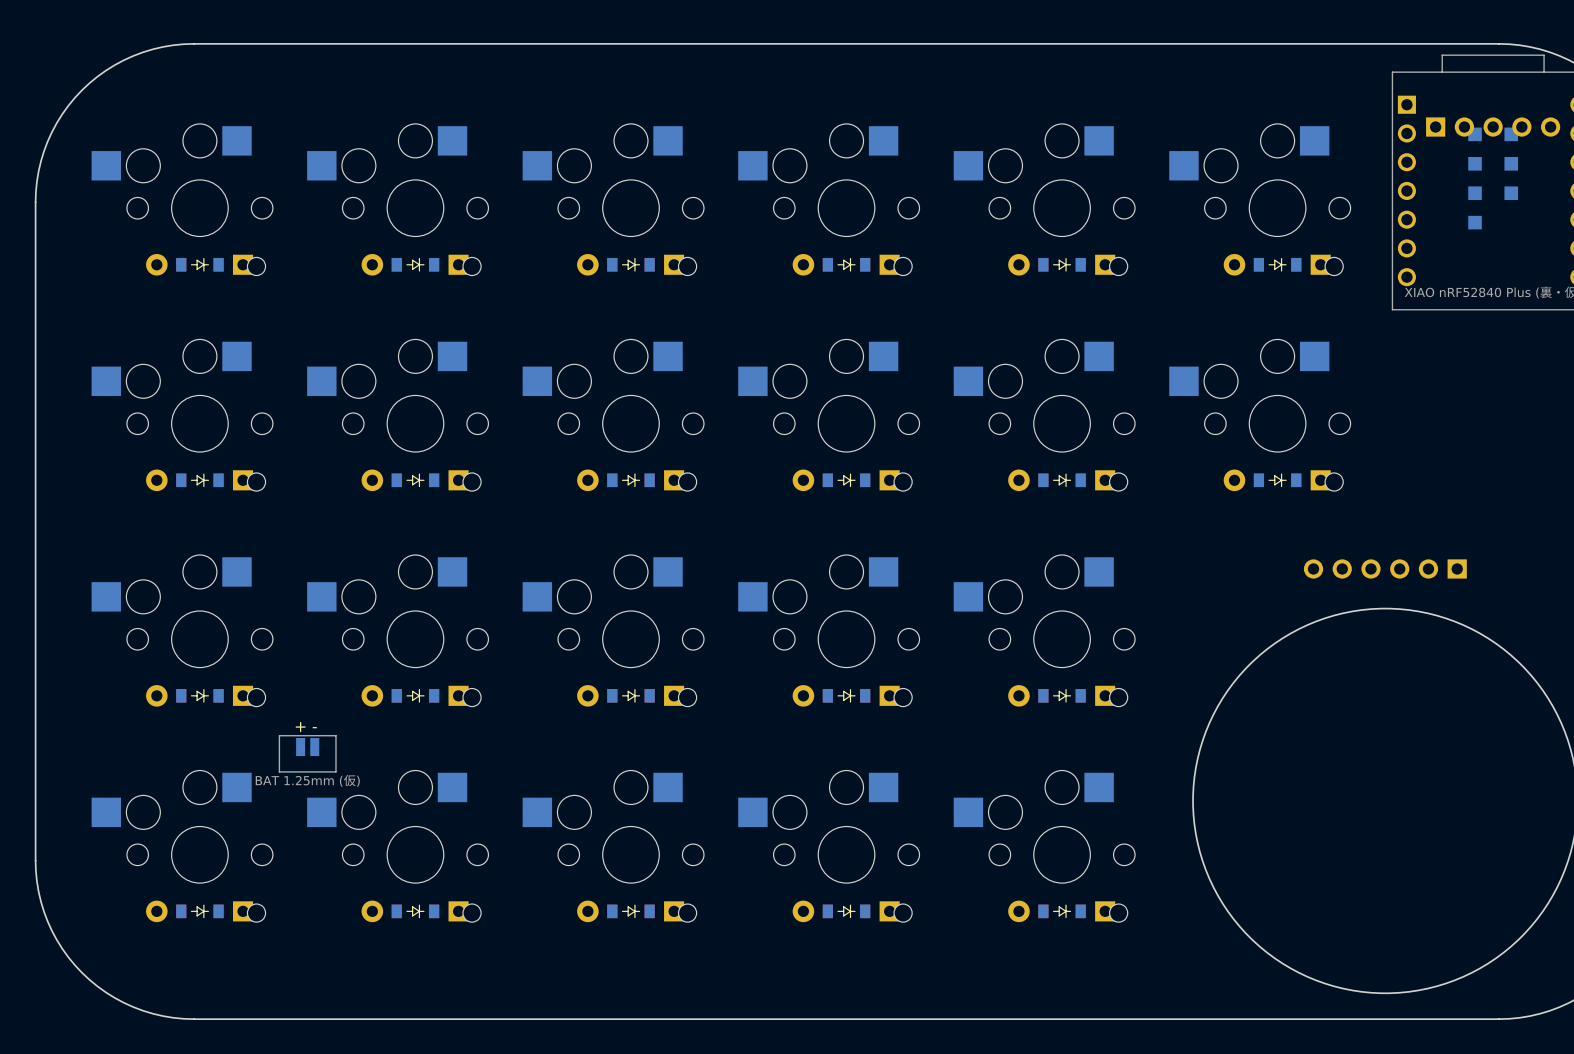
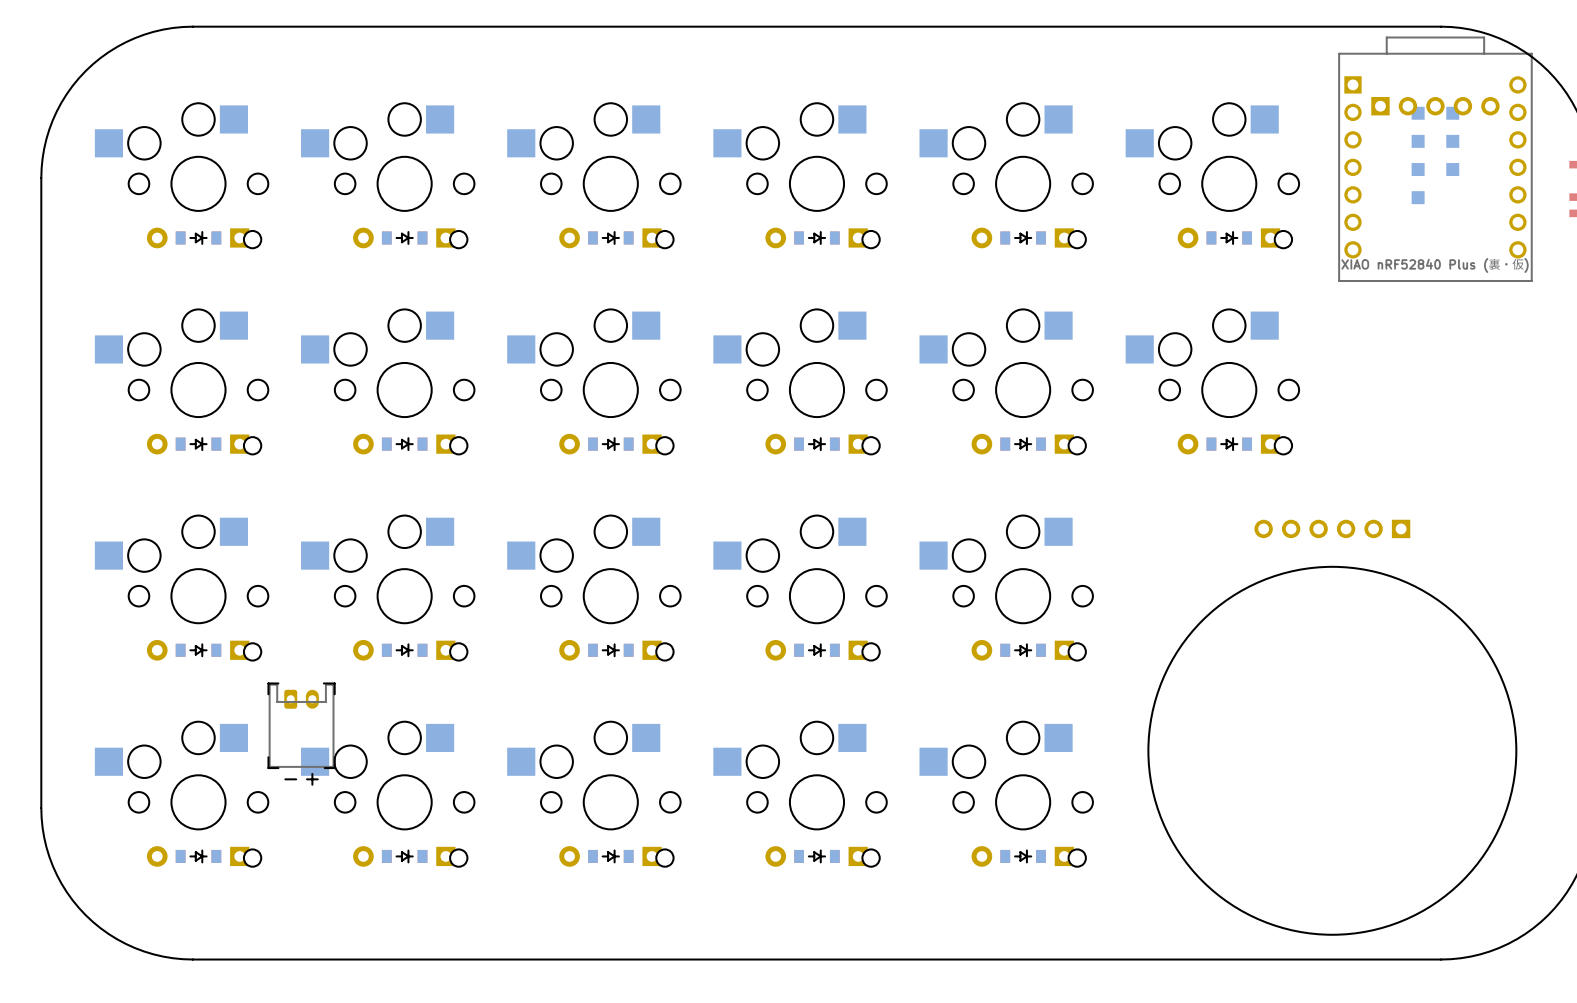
part: (307, 753) -> none
part: none -> (301, 734)

